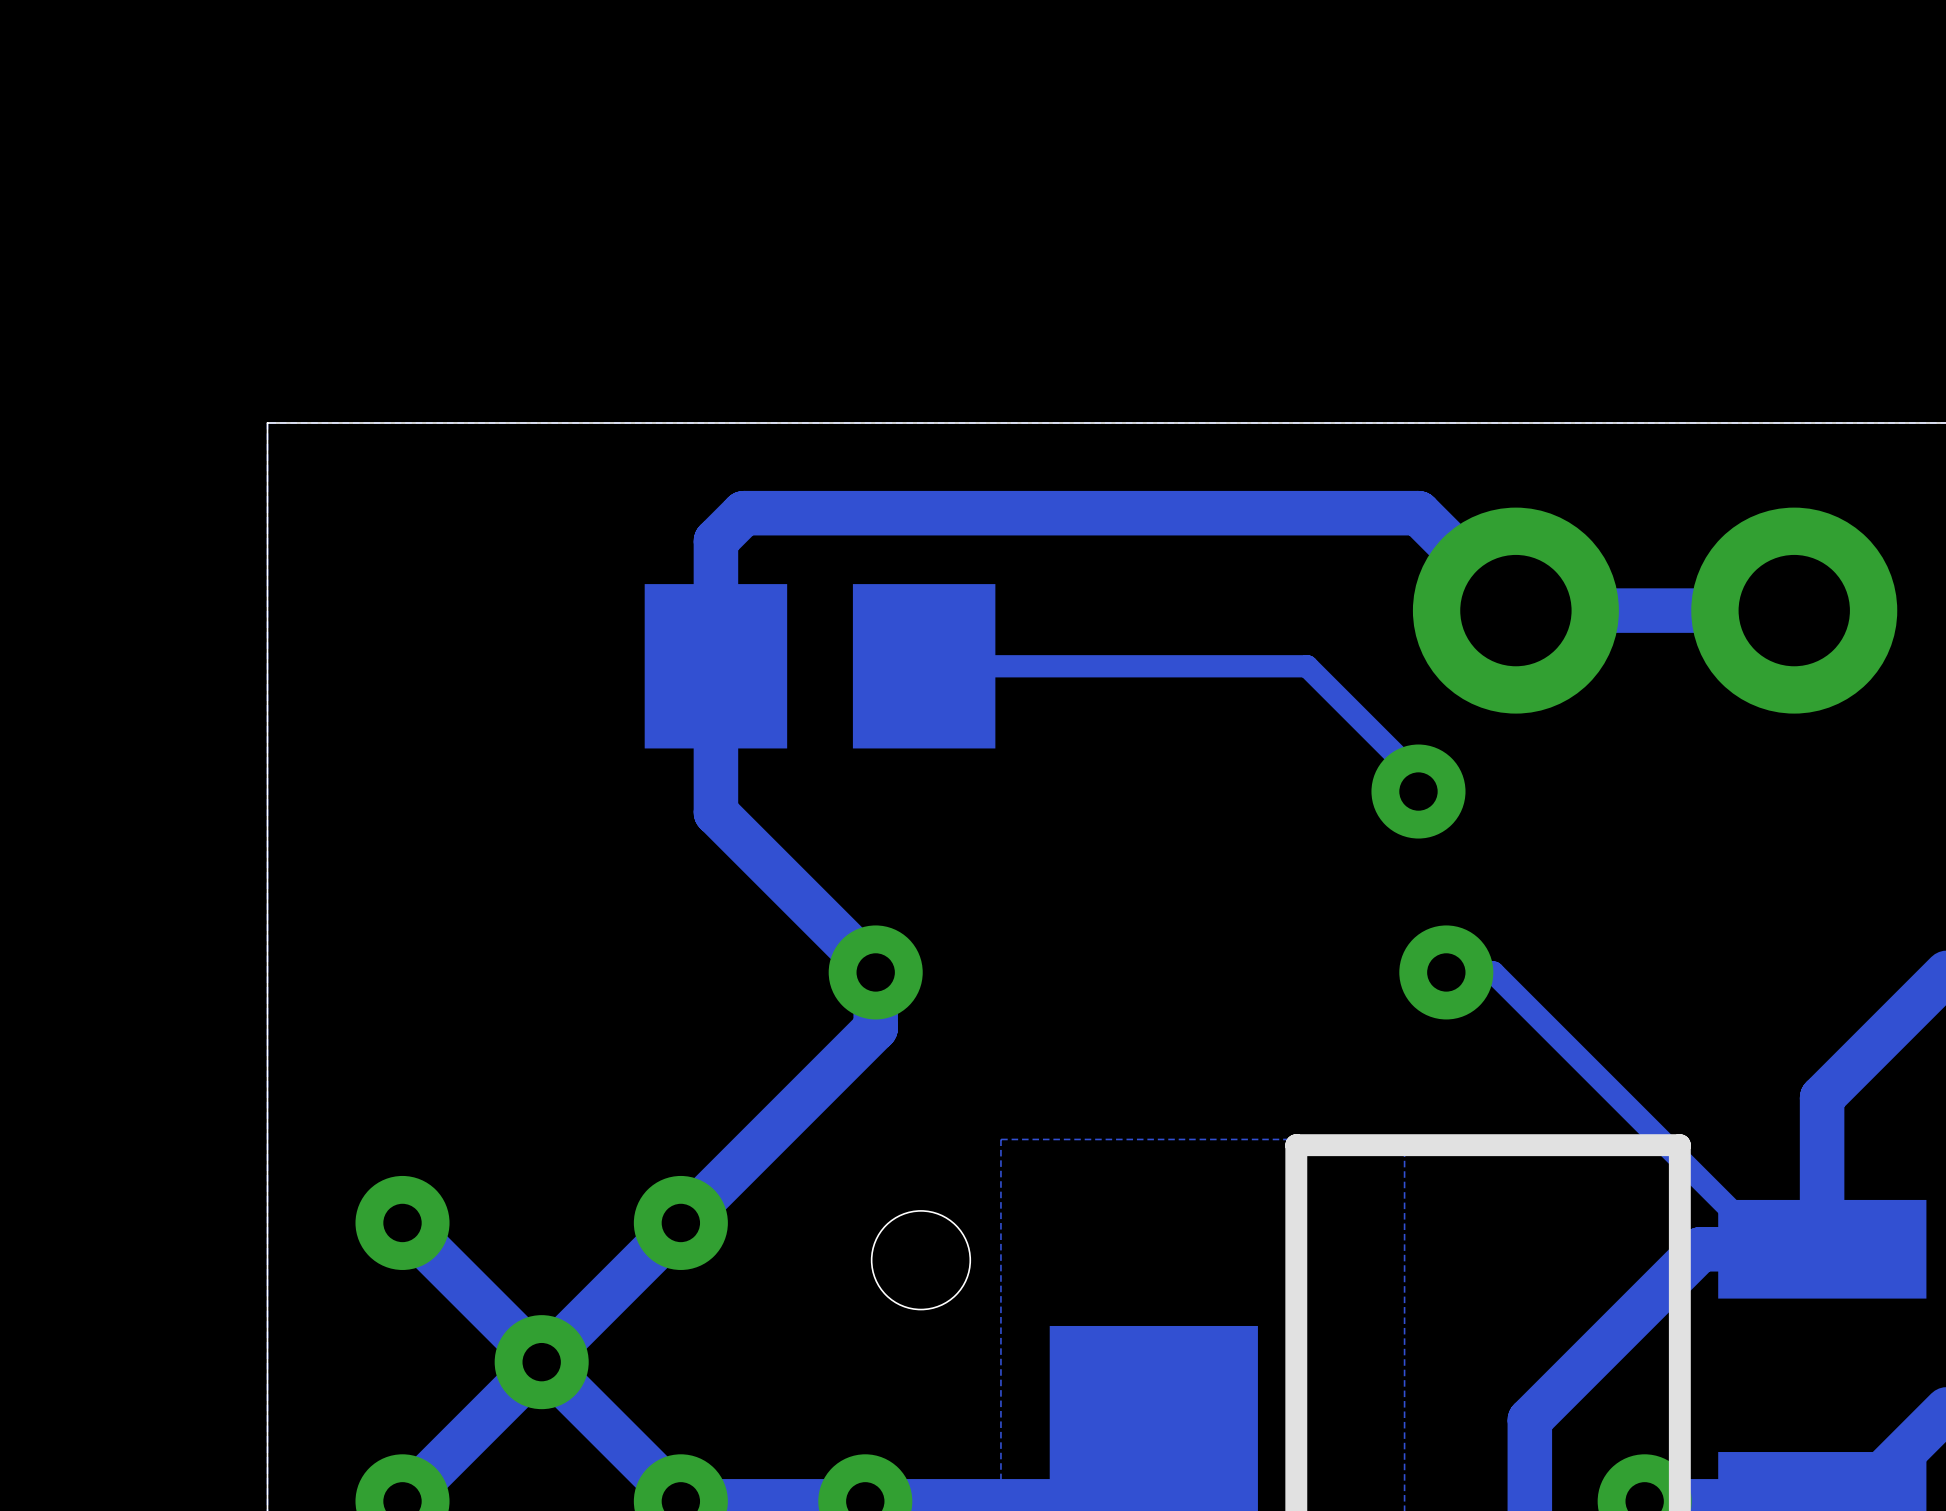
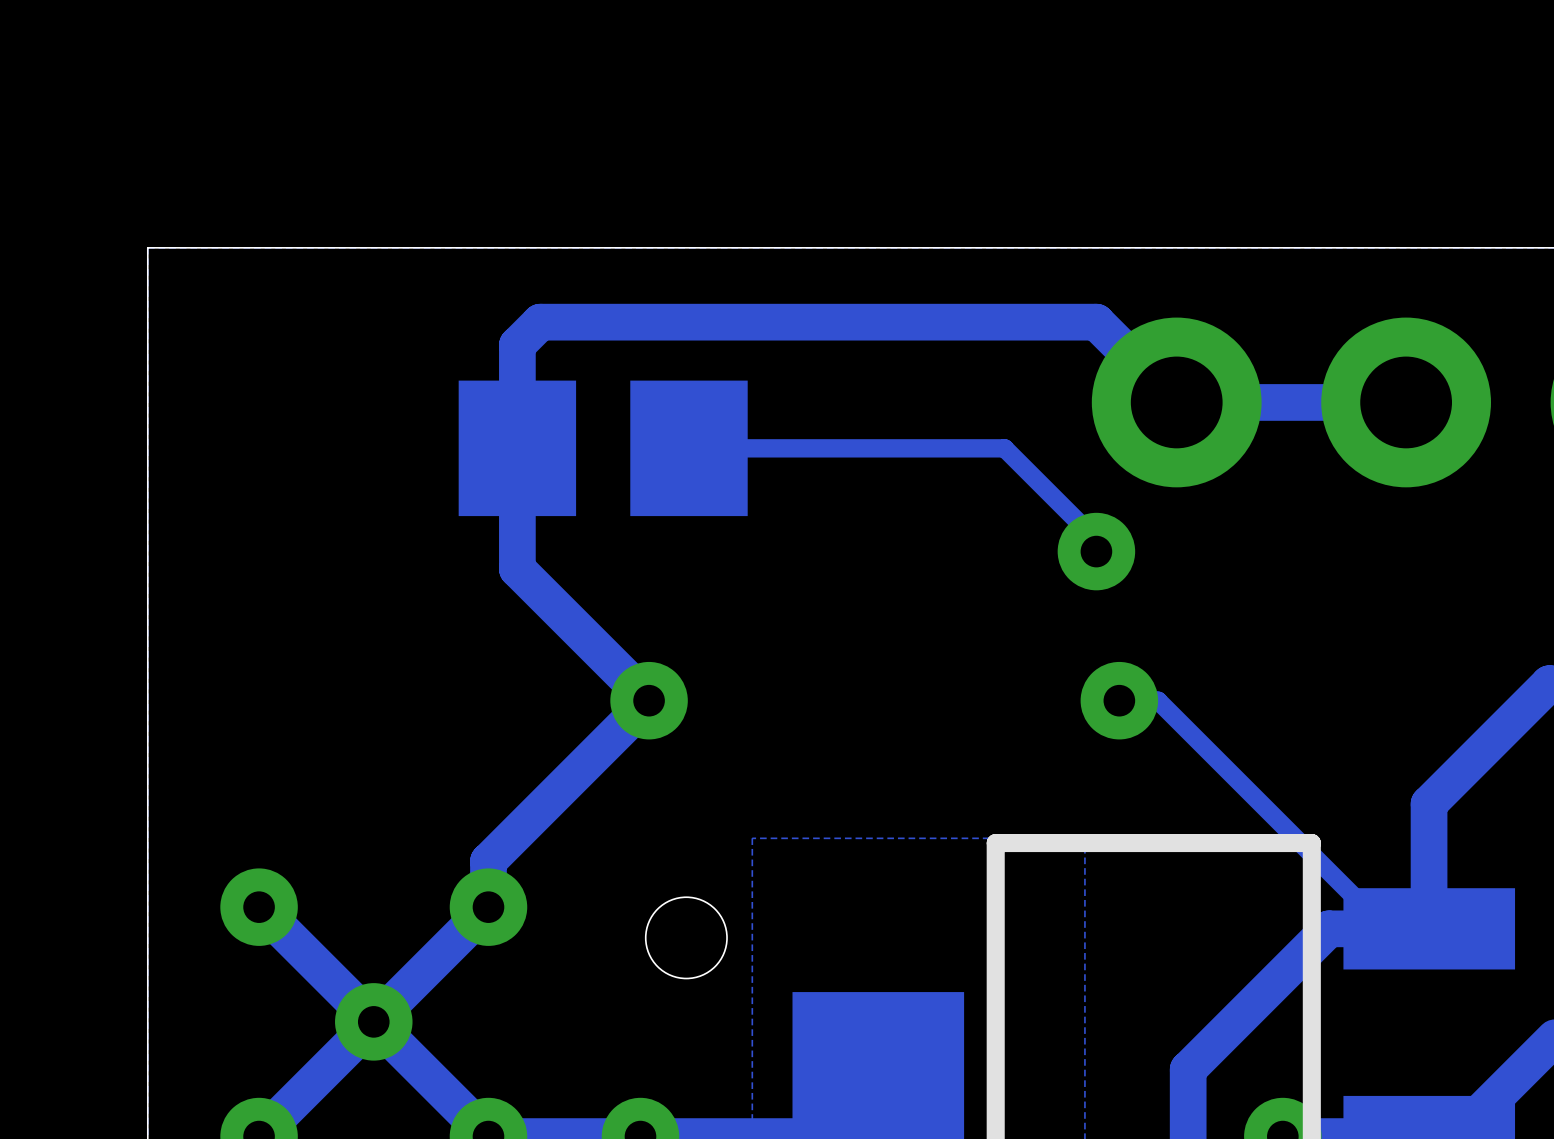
track: (875, 972) (875, 1028) (680, 1222) -> (649, 700) (488, 861) (488, 907)

